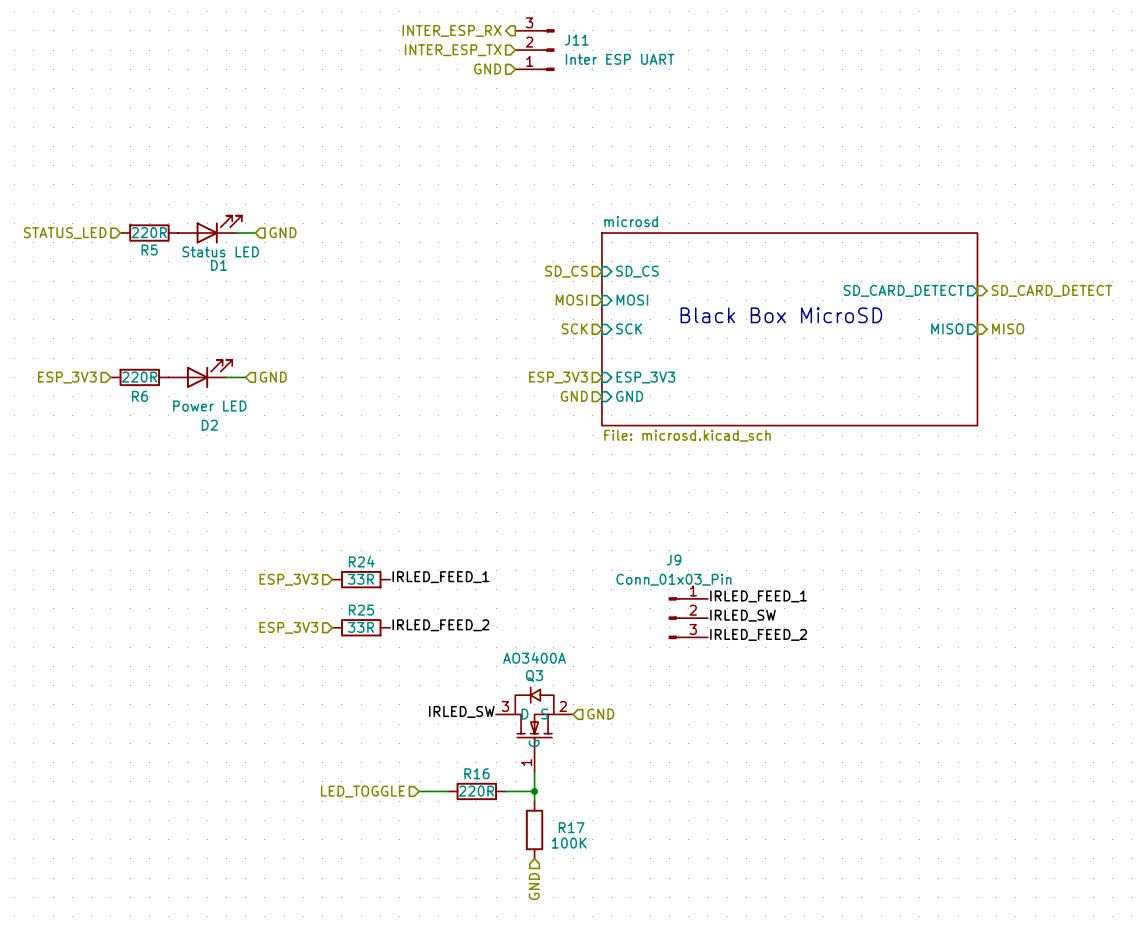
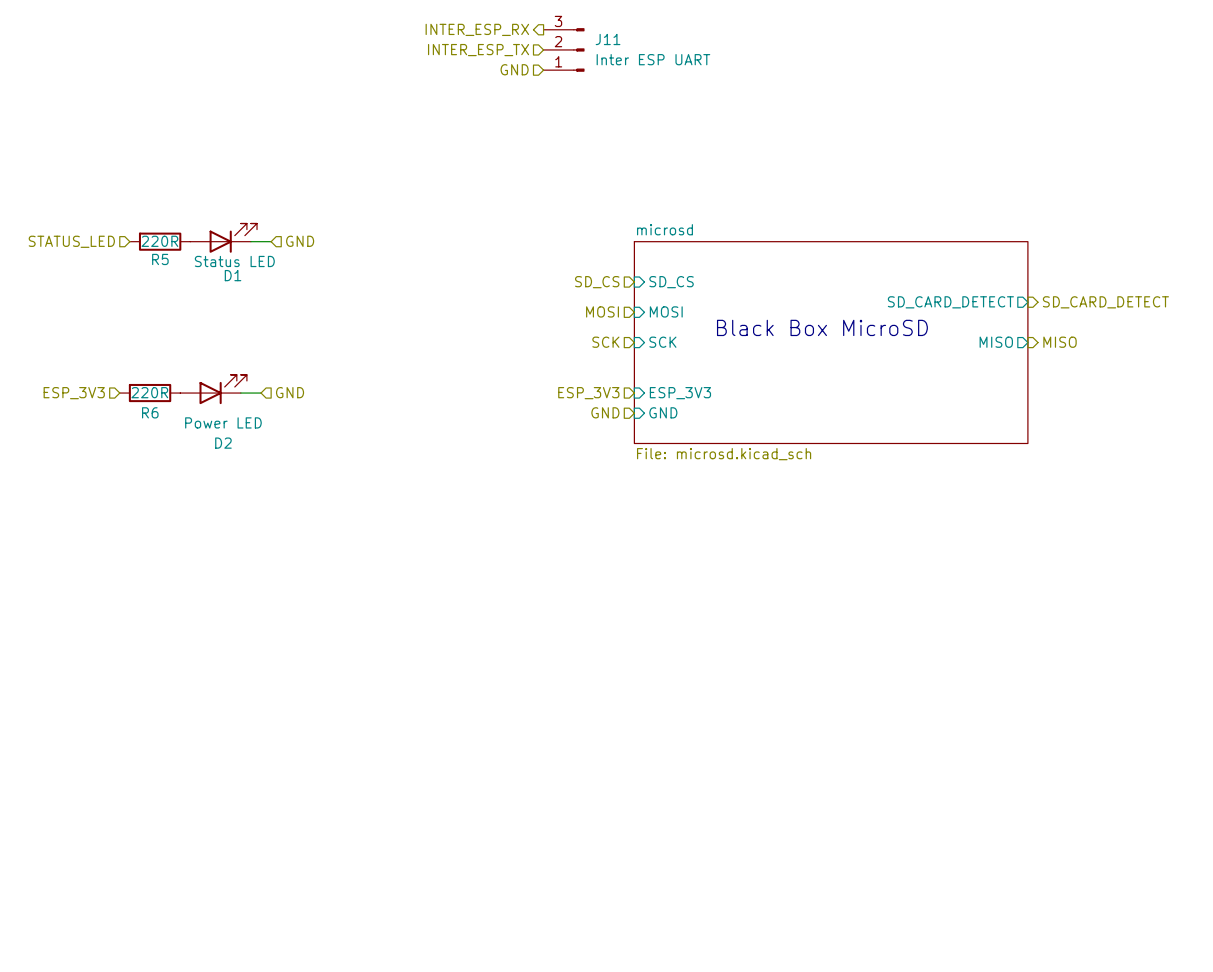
label: IRLED_FEED_1 (440, 577) -> none
hierarchical label: ESP_3V3 (288, 579) -> none
R24: 33R (361, 579) -> none
label: IRLED_FEED_1 (758, 596) -> none
label: IRLED_SW (743, 615) -> none
J9: Conn_01x03_Pin (688, 618) -> none
label: IRLED_FEED_2 (440, 625) -> none
hierarchical label: ESP_3V3 (288, 627) -> none
R25: 33R (361, 627) -> none
label: IRLED_FEED_2 (758, 634) -> none
label: IRLED_SW (461, 711) -> none
hierarchical label: GND (600, 714) -> none
Q3: AO3400A (534, 729) -> none
wire: (534, 772) (534, 801) -> none
hierarchical label: LED_TOGGLE (362, 791) -> none
wire: (419, 791) (447, 791) -> none
R16: 220R (476, 791) -> none
wire: (505, 791) (534, 791) -> none
junction: (534, 791) -> none
R17: 100K (534, 829) -> none
hierarchical label: GND (534, 886) -> none

